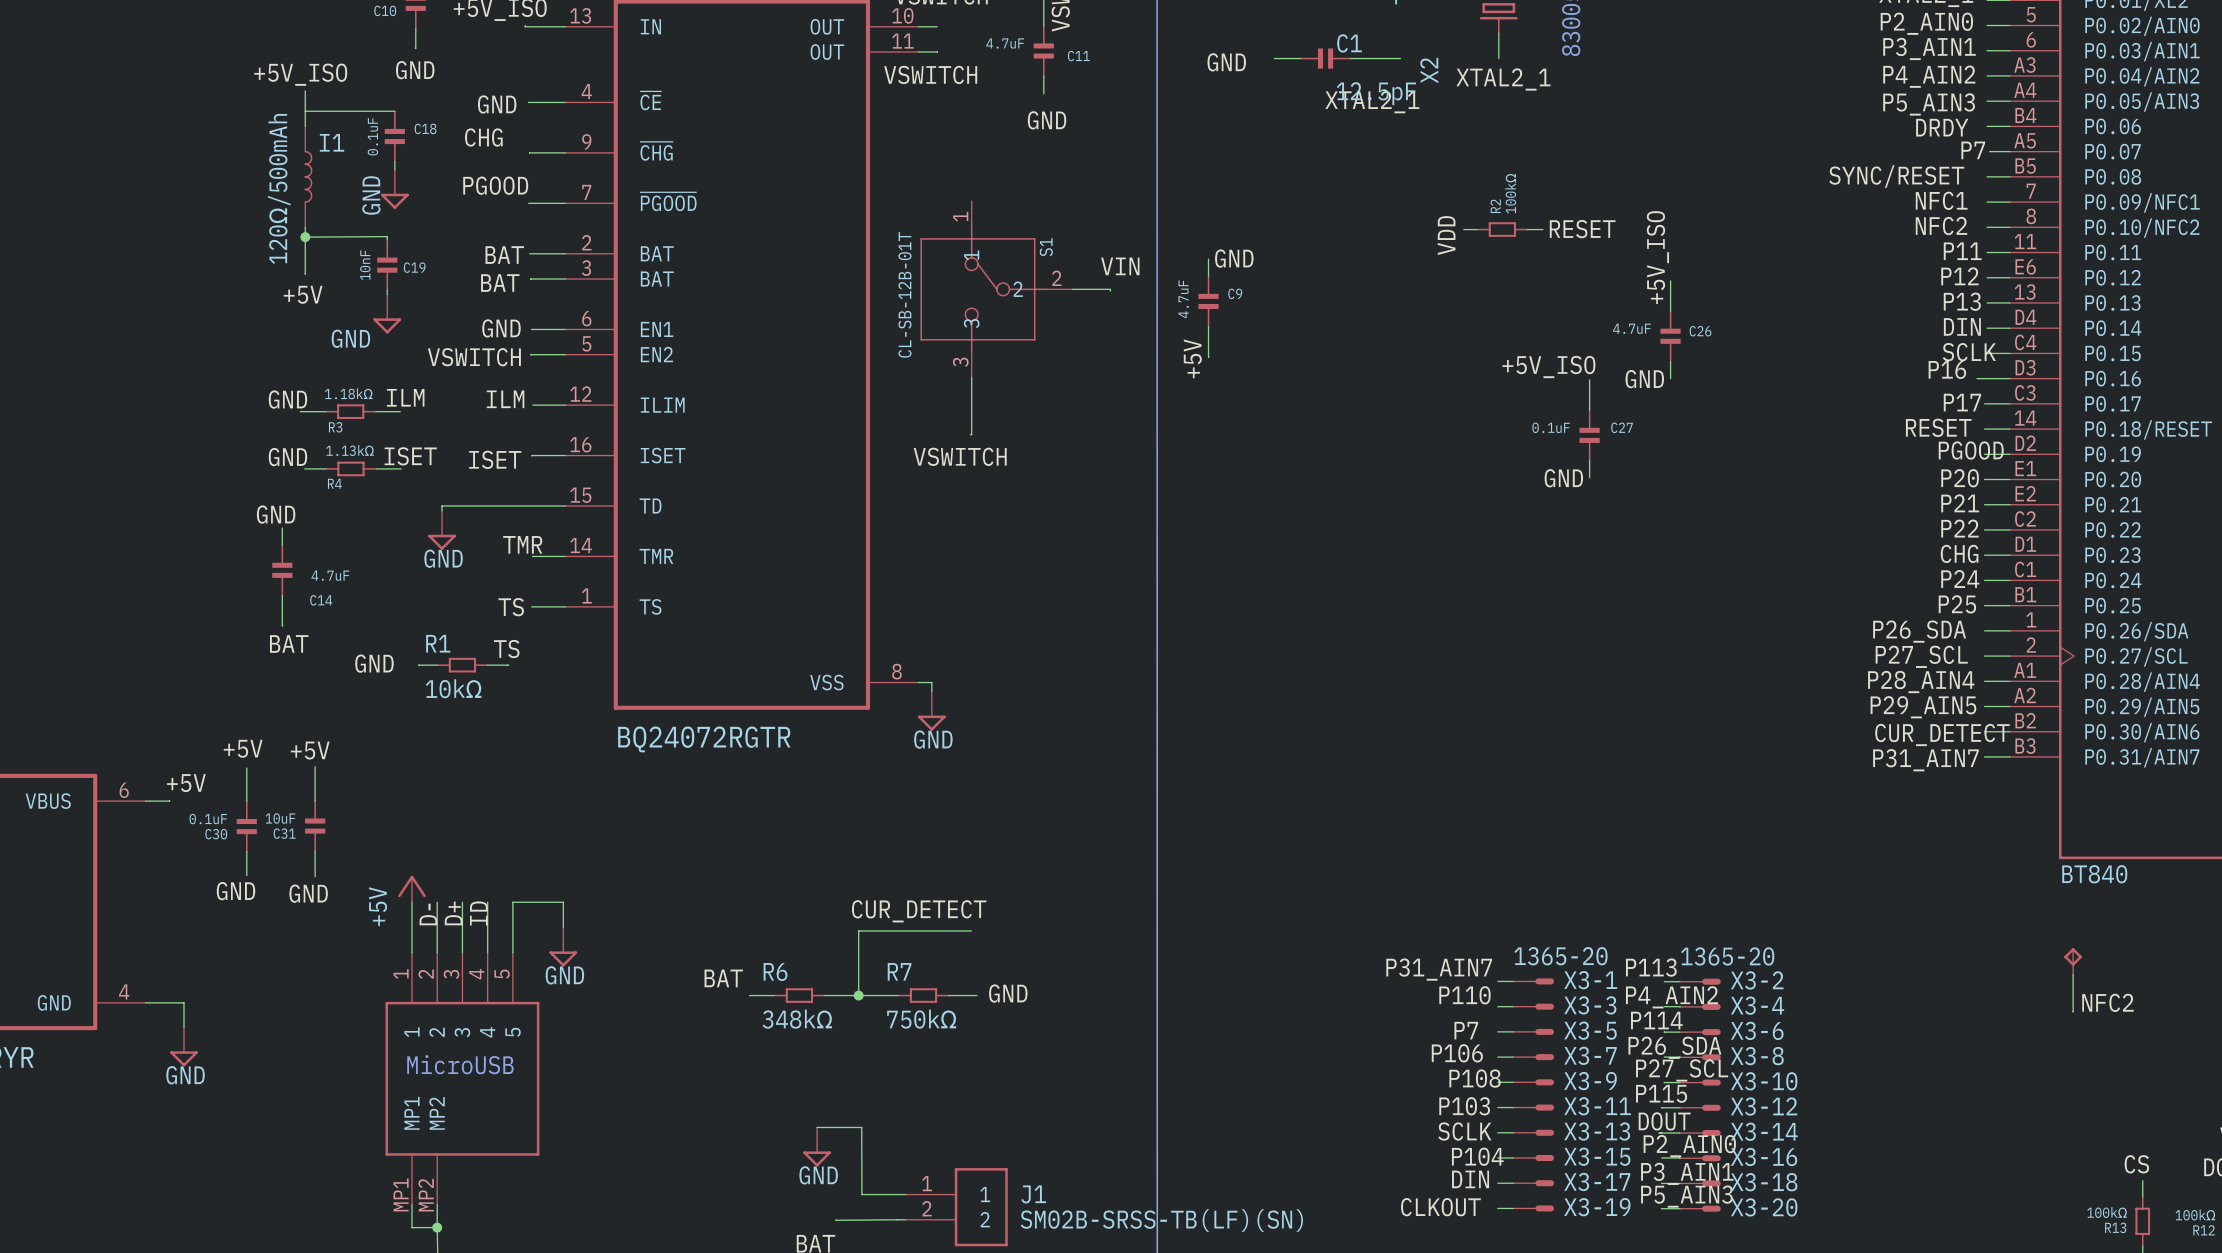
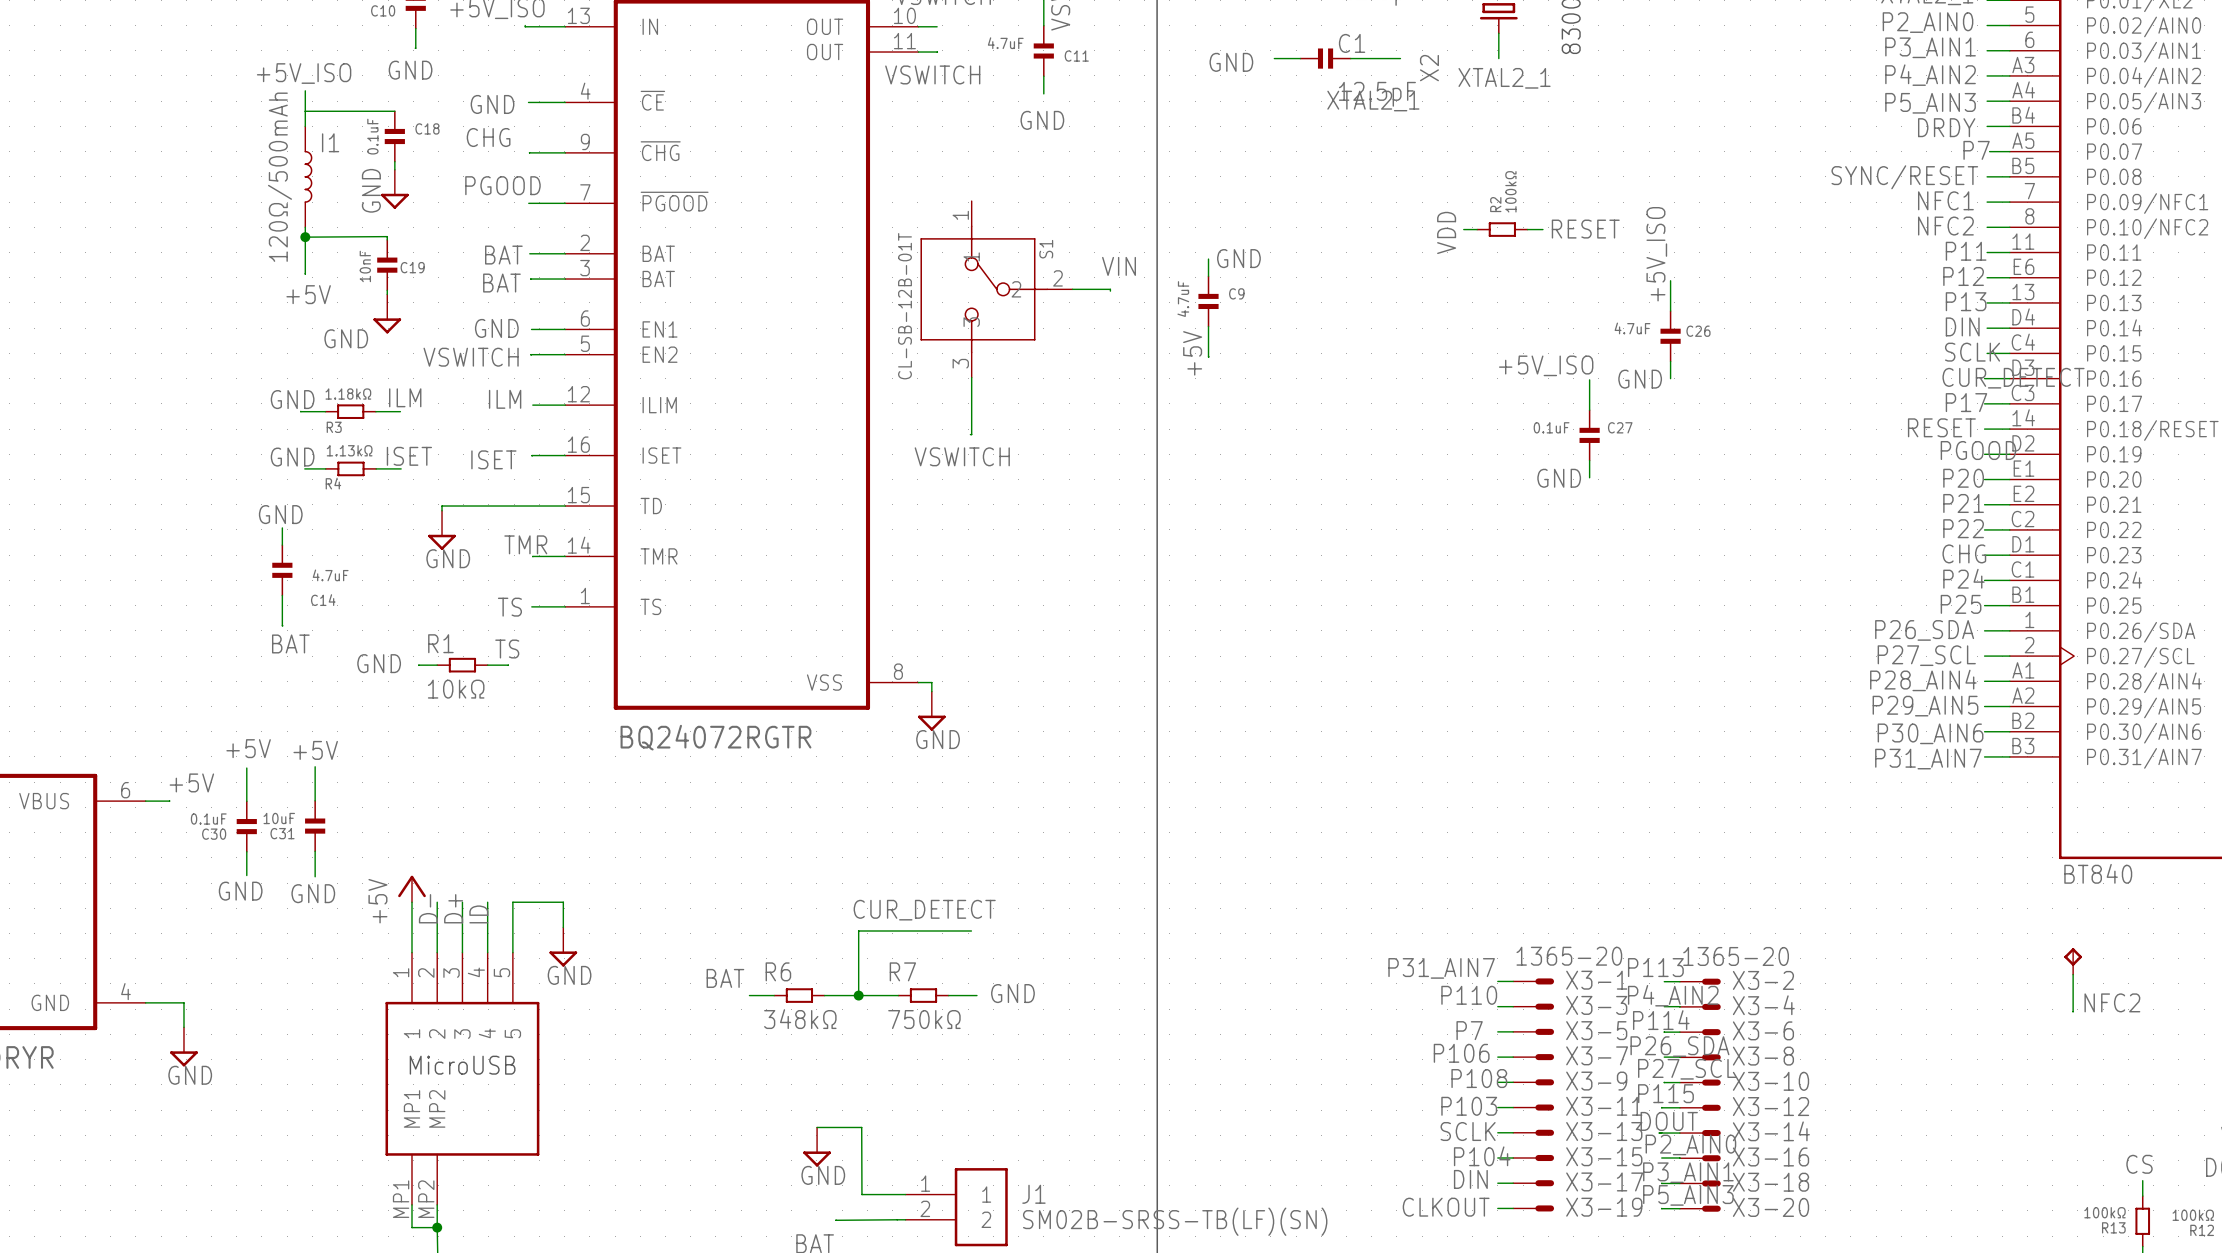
label: P16 (1947, 369) -> none
wire: (1977, 378) (1984, 378) -> none
label: none -> CUR_DETECT (2013, 378)
label: CUR_DETECT (1942, 734) -> P30_AIN6 (1930, 733)

